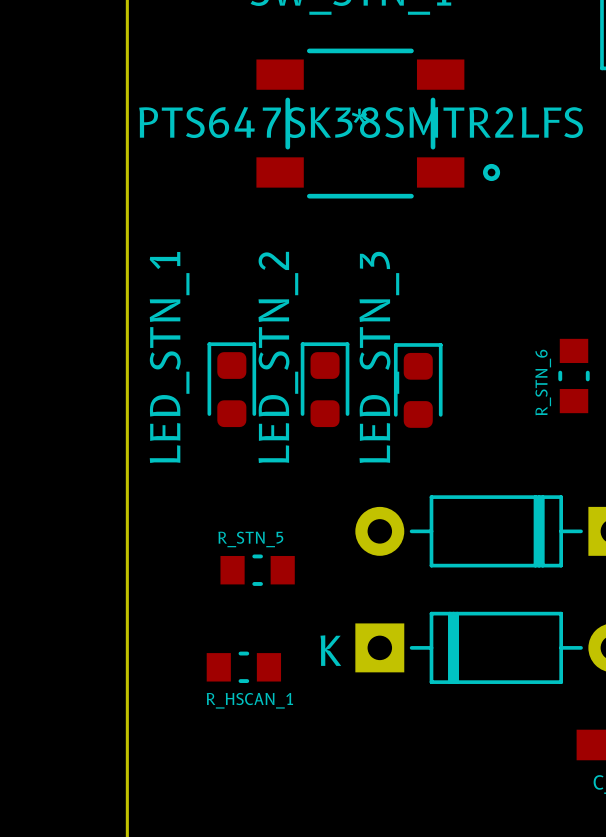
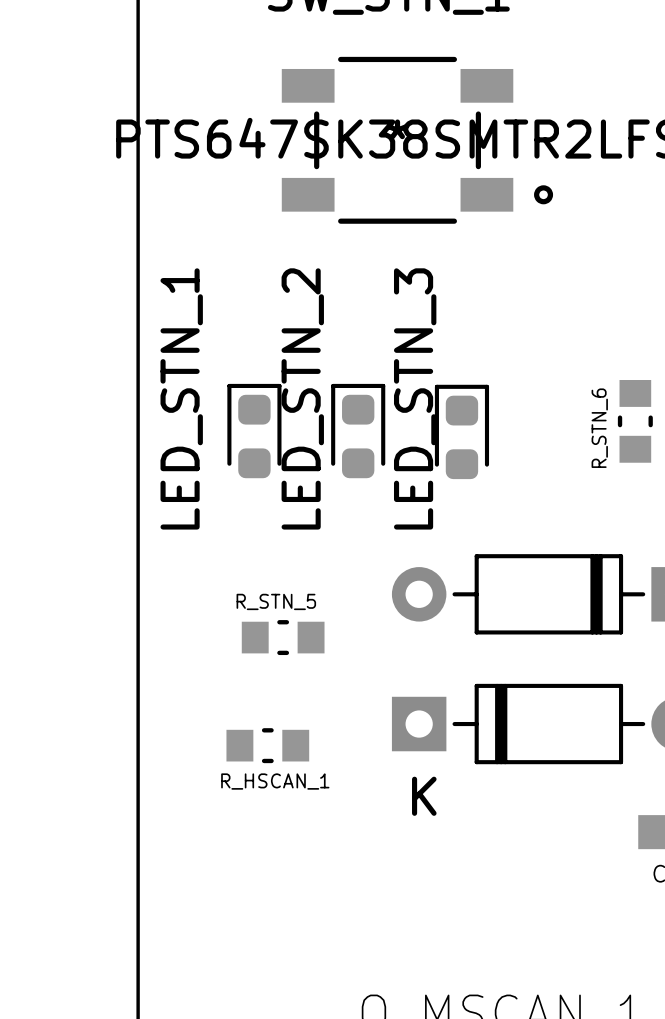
part text position: K (330, 650) -> K (424, 796)

